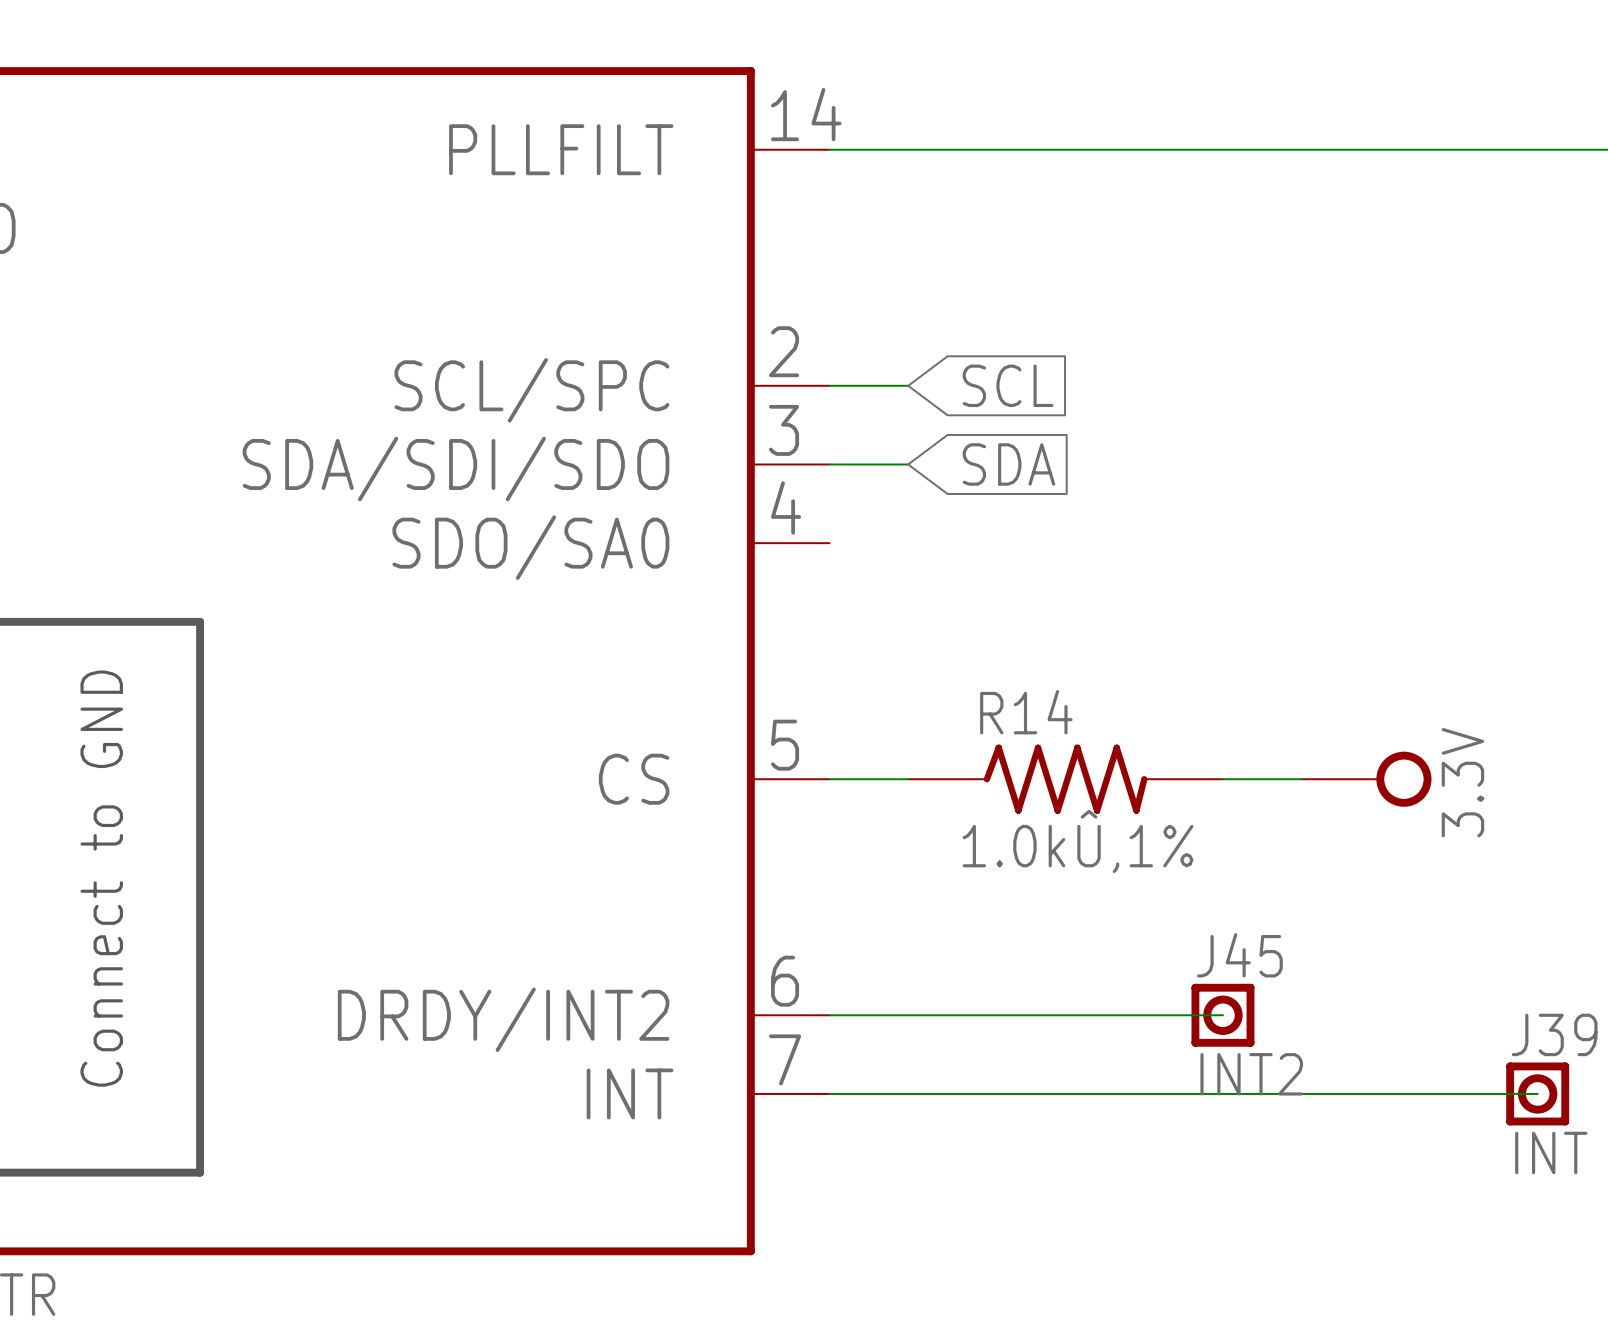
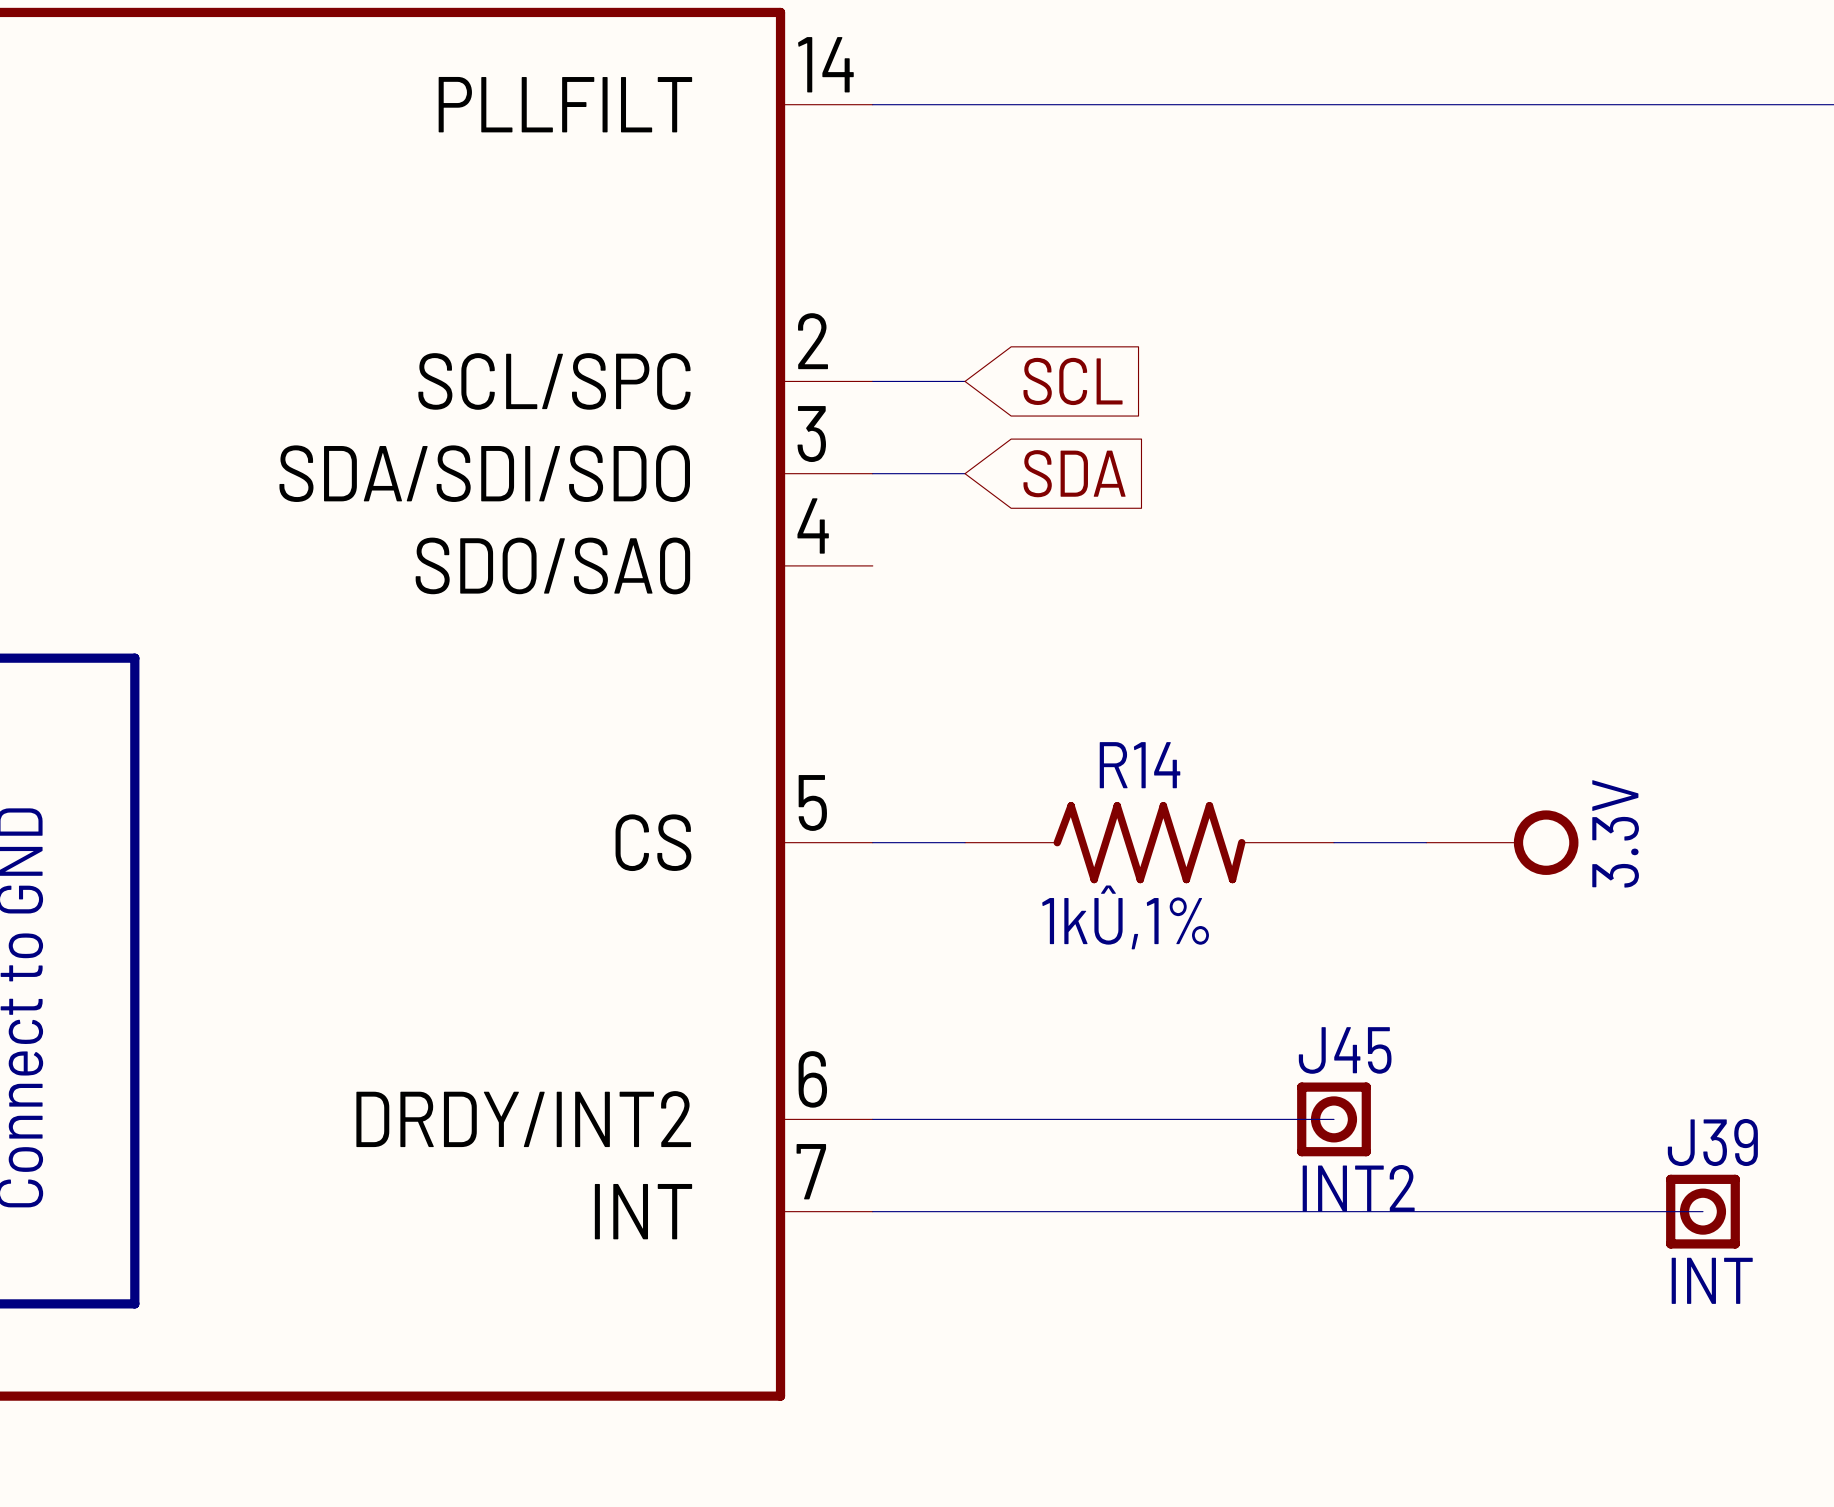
R14 name position: R14 (1026, 712) -> R14 (1140, 765)
R14 text: none -> 1kÛ,1% (1125, 917)
R14 text: 1.0kÛ,1% (1078, 841) -> none

